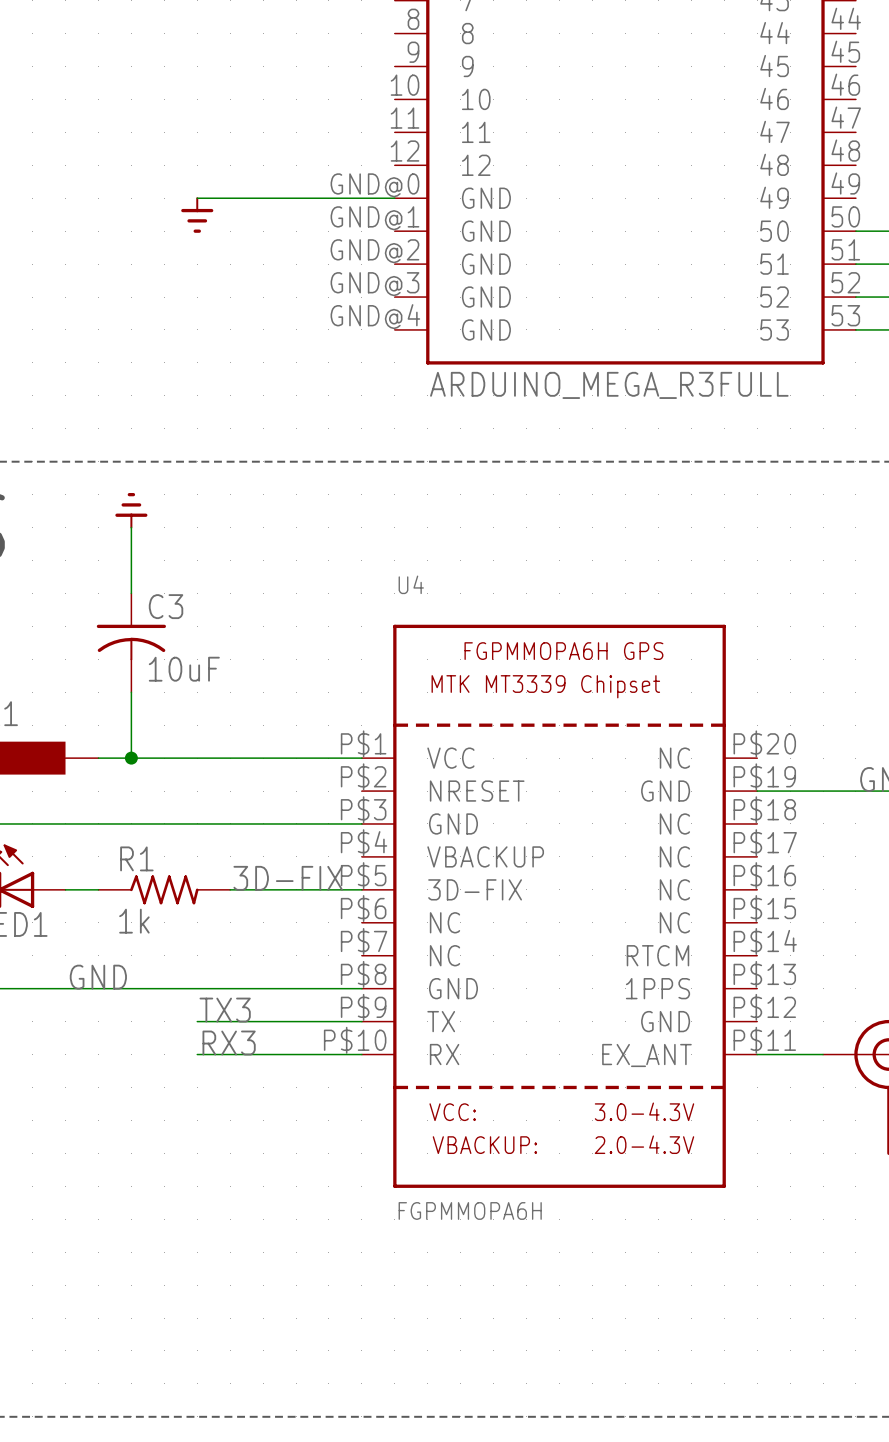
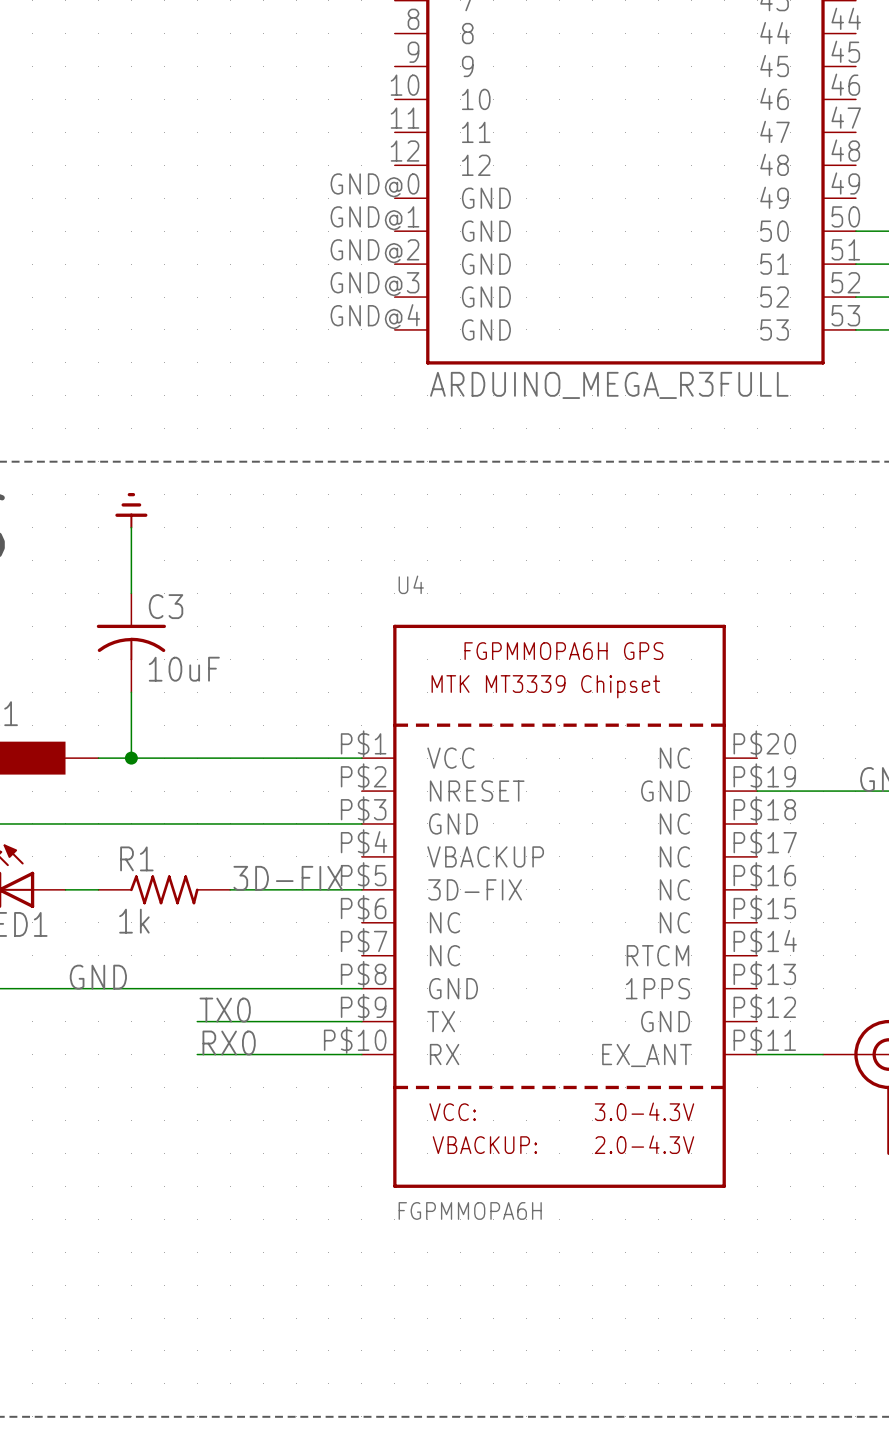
wire: (197, 198) (394, 198) -> none
power symbol: (197, 215) -> none
label: TX3 (225, 1010) -> TX0 (225, 1010)
label: RX3 (229, 1043) -> RX0 (229, 1043)

